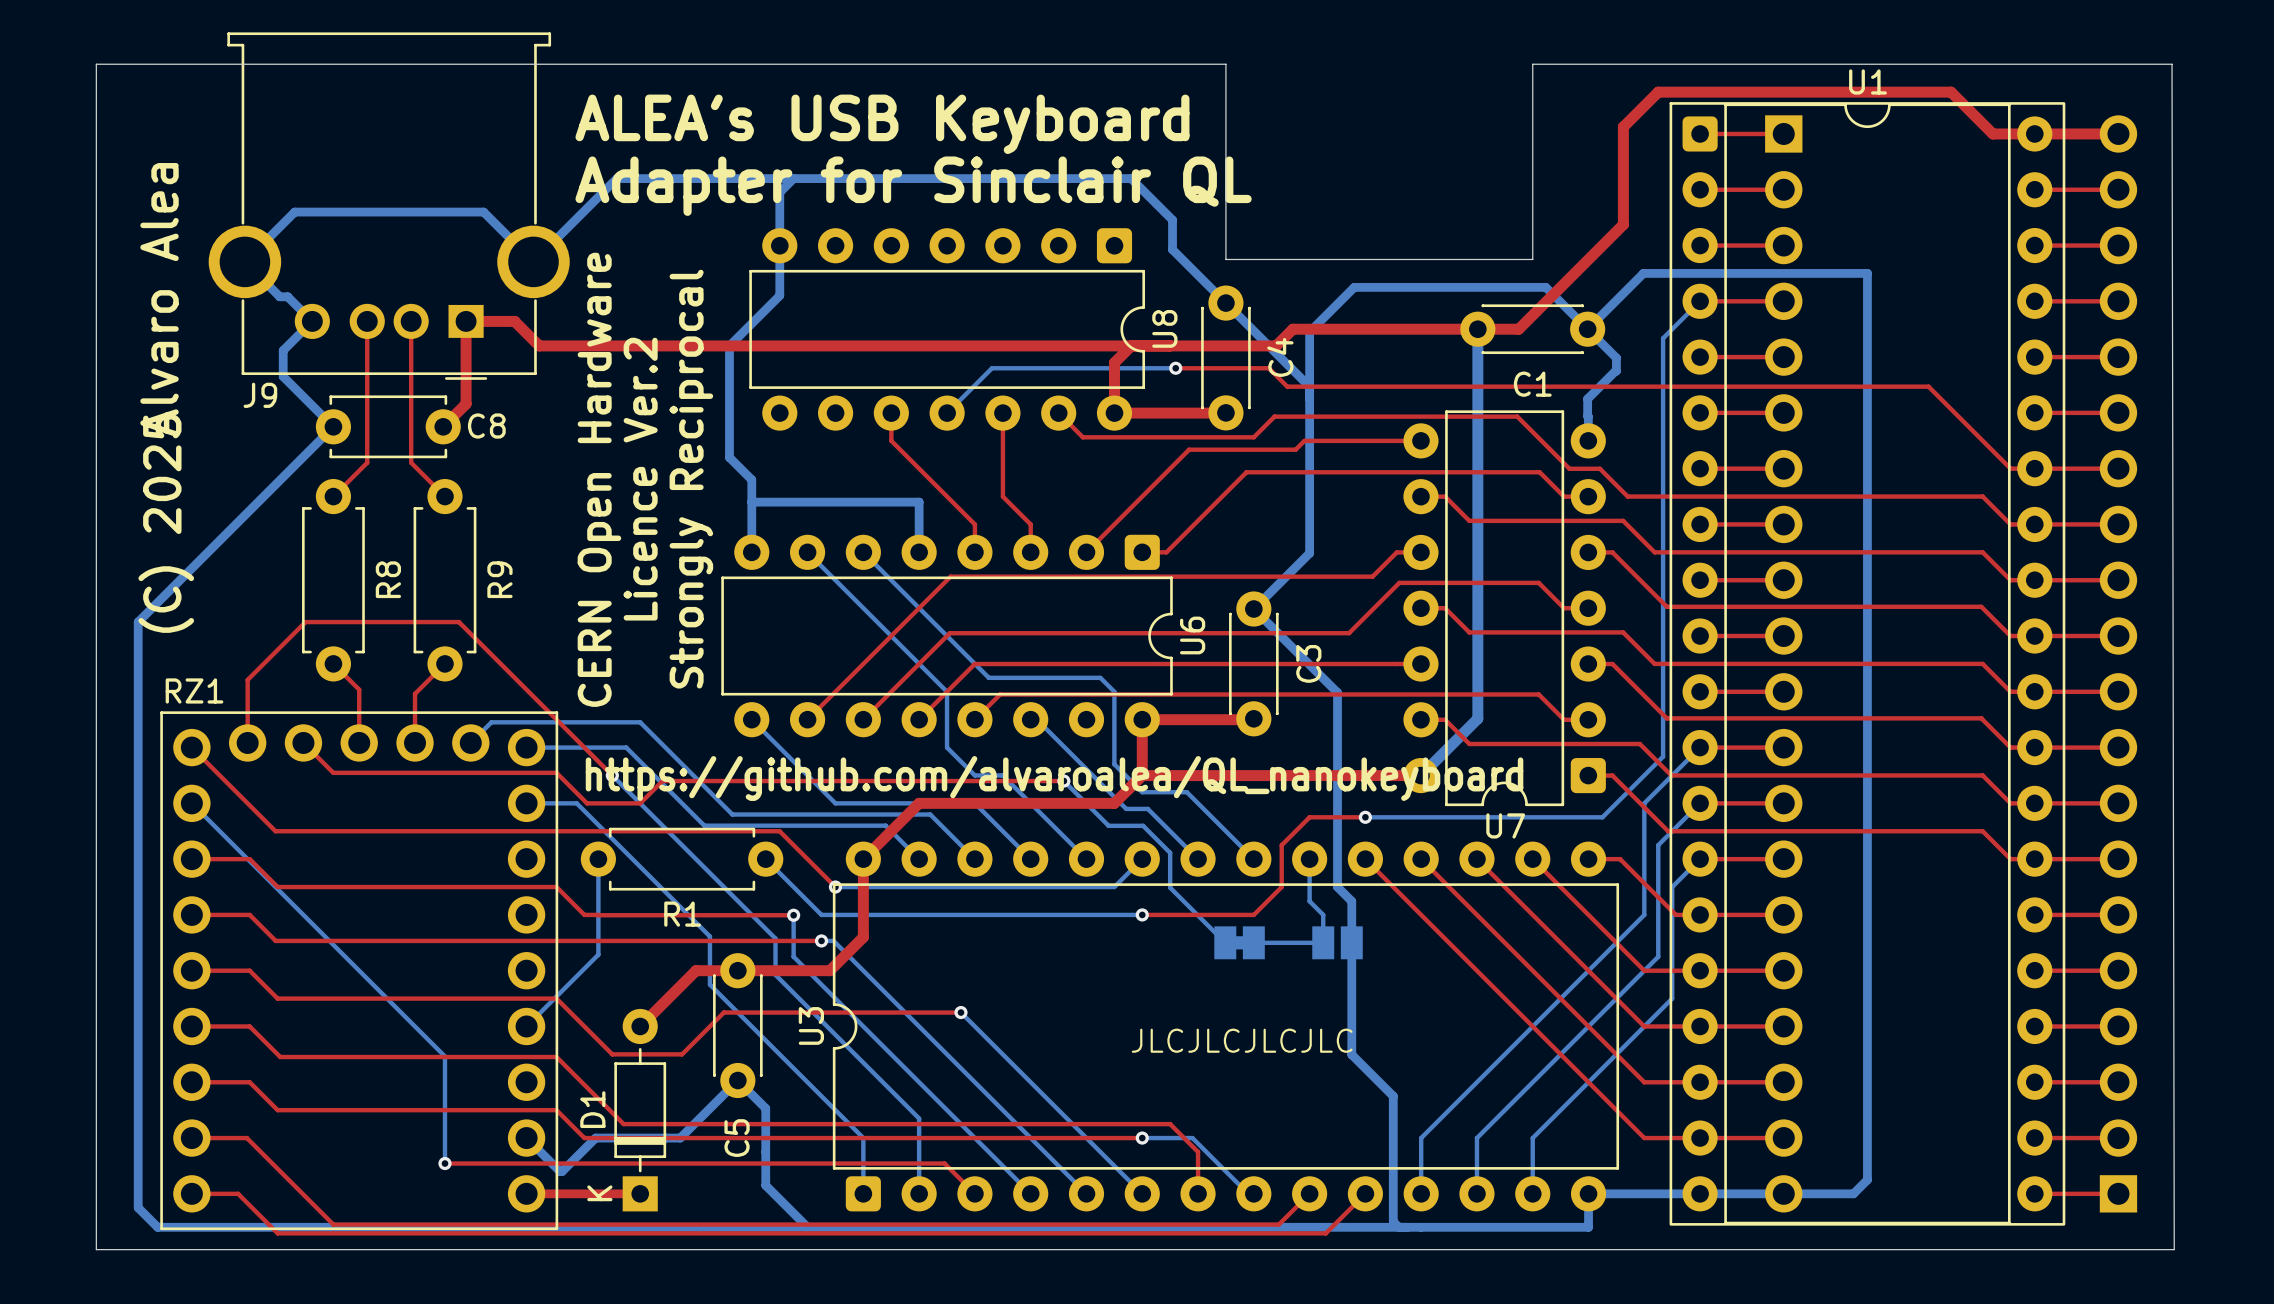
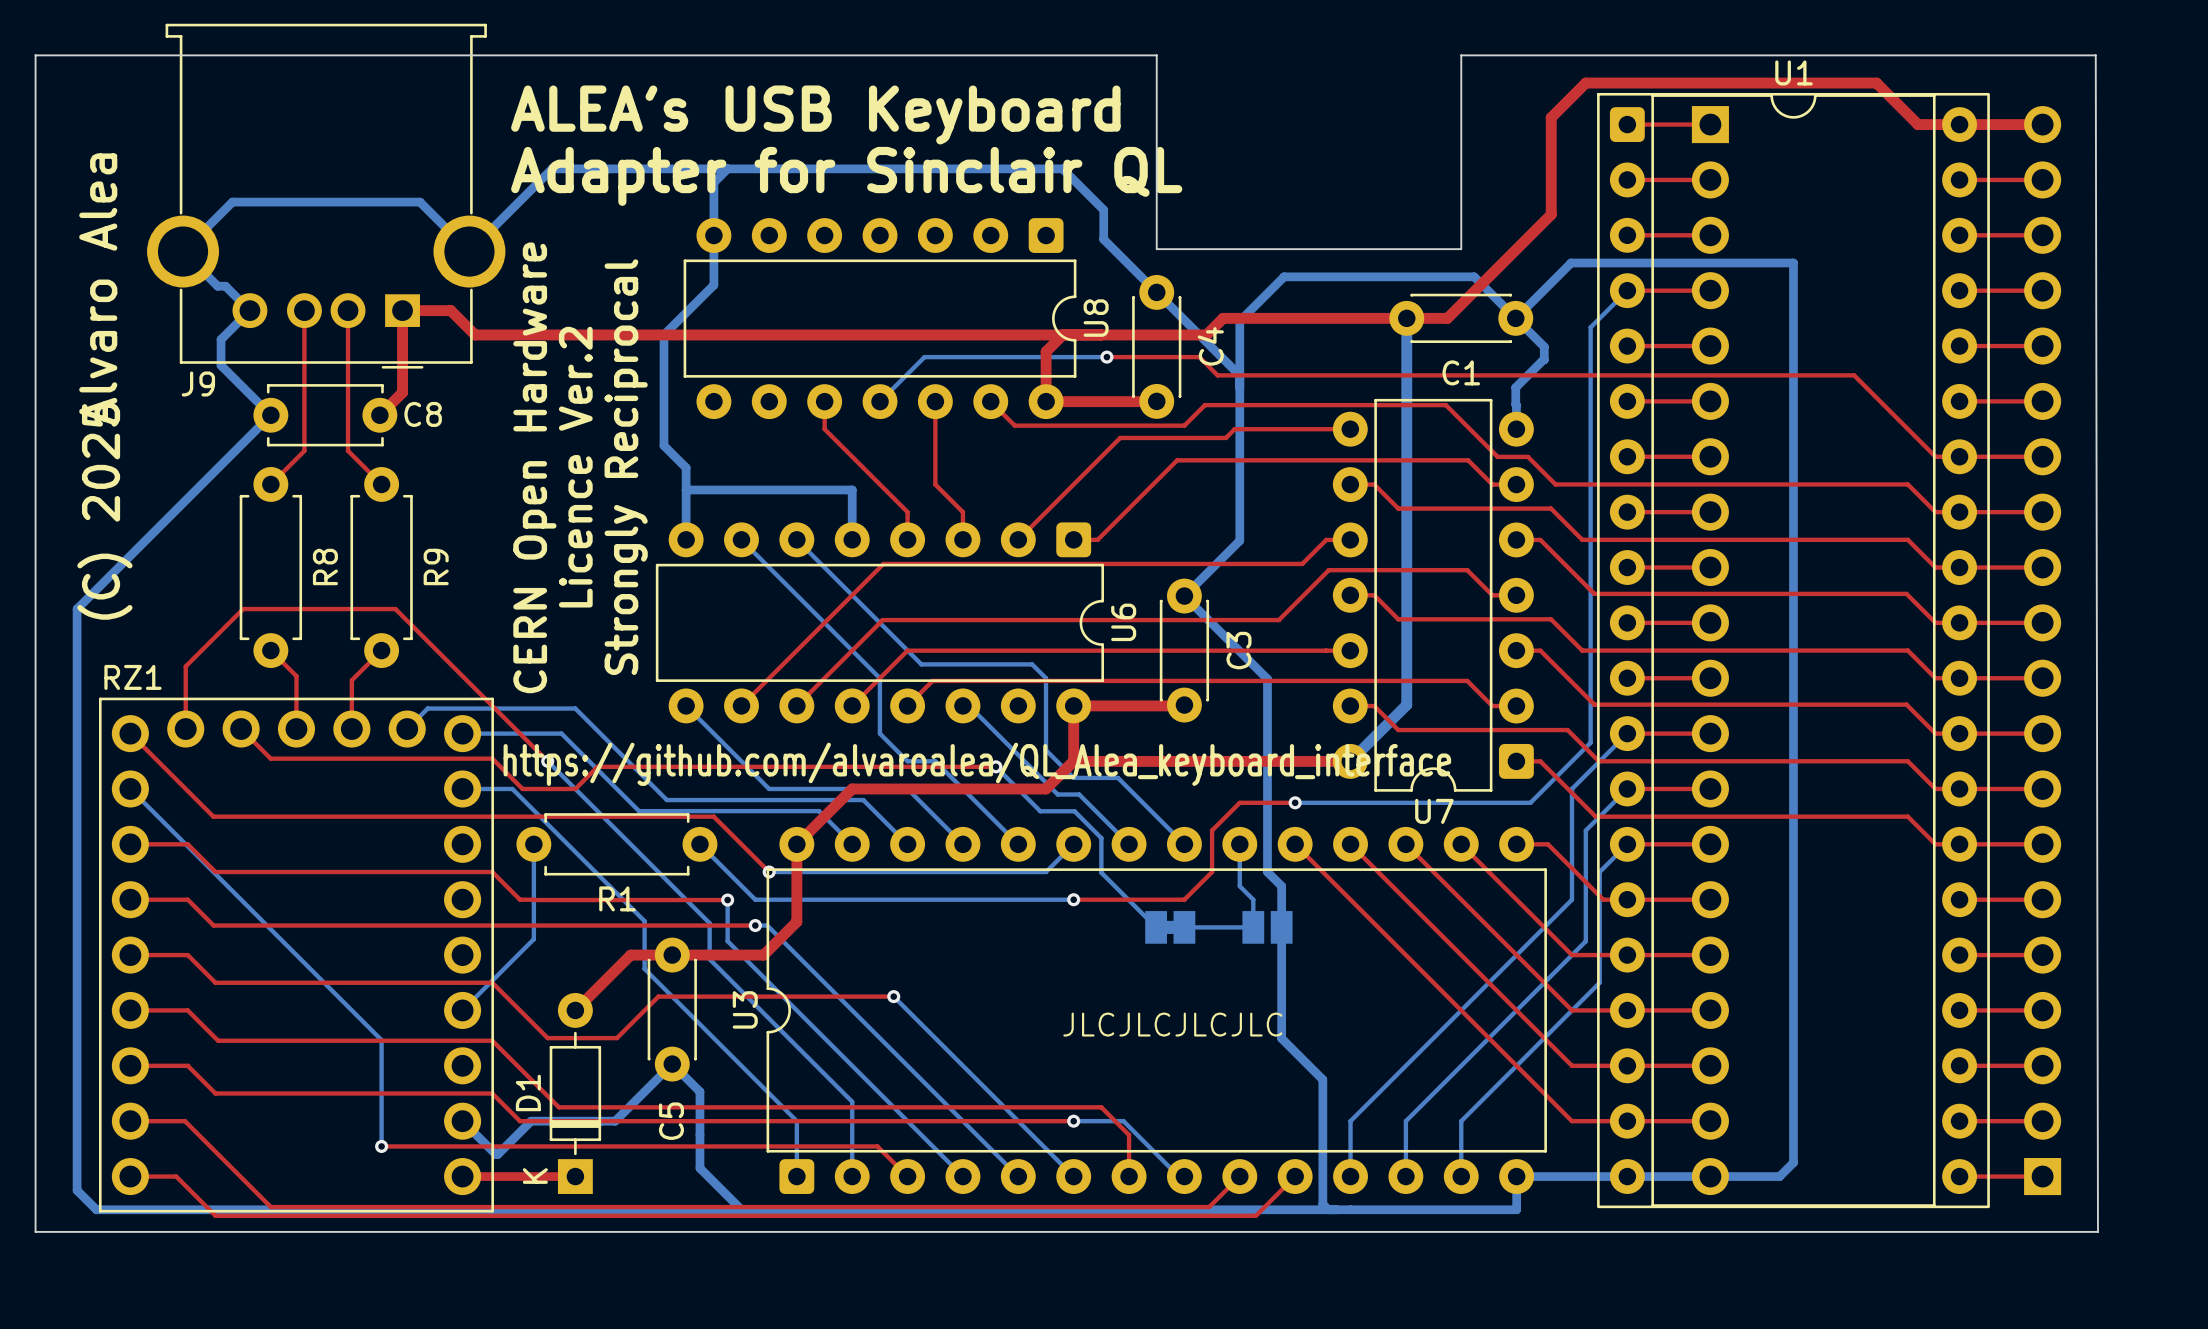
text: https://github.com/alvaroalea/QL_nanokeyboard (1054, 778) -> https://github.com/alvaroalea/QL_Alea_keyboard_interface (977, 764)

